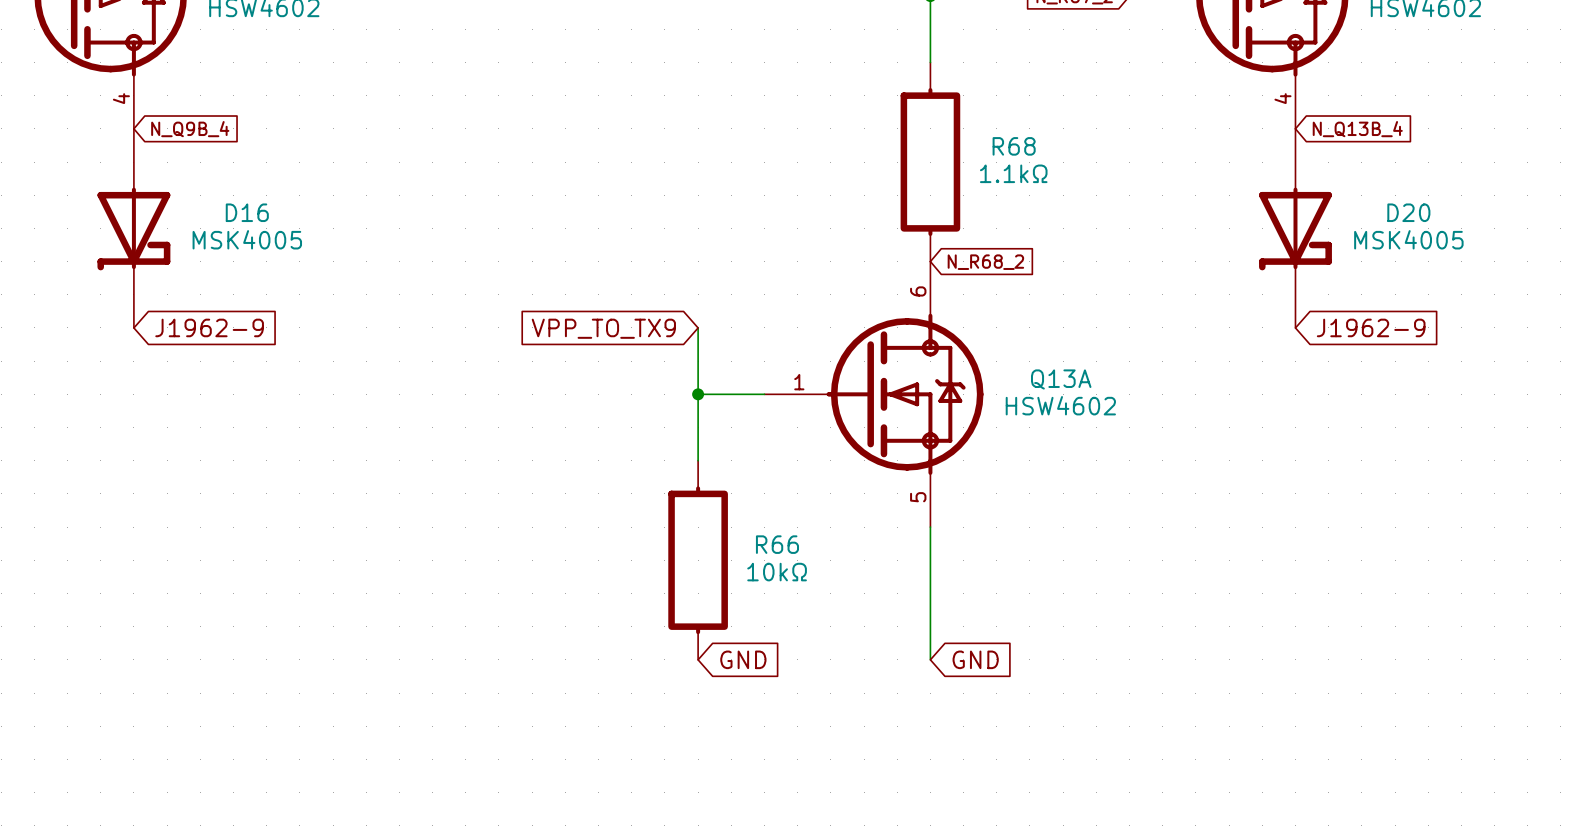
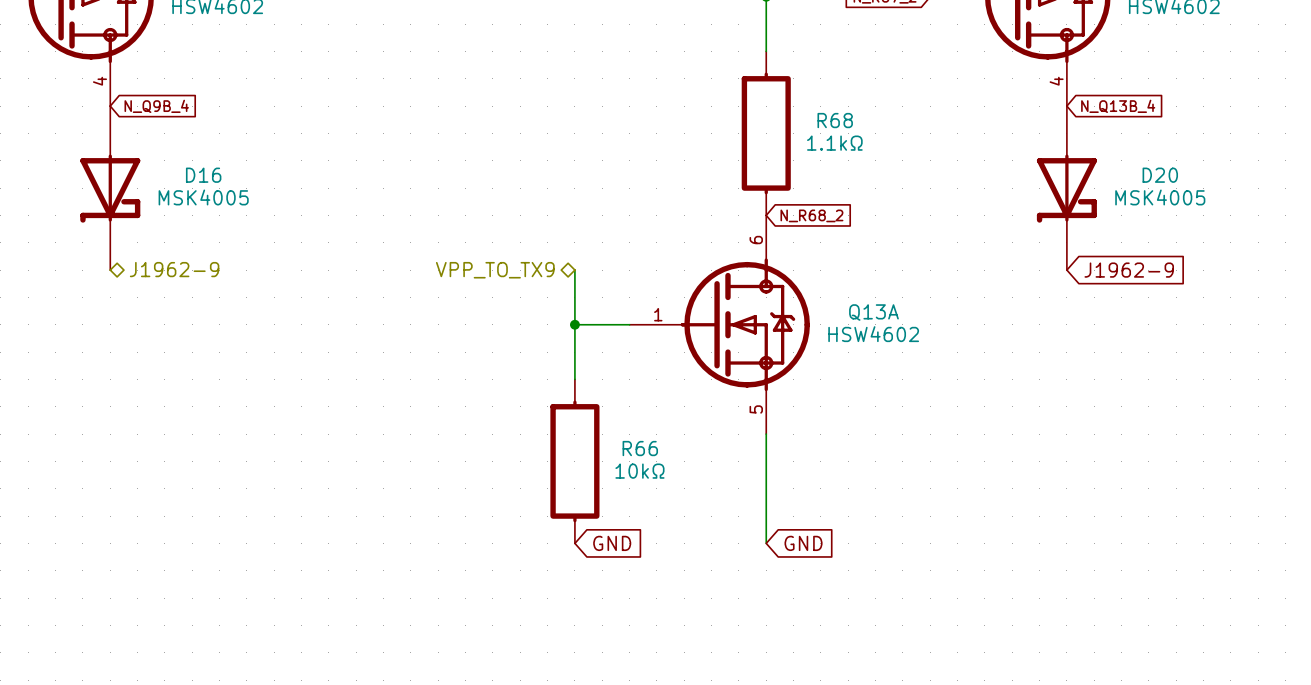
global label: J1962-9 (209, 327) -> none
hierarchical label: none -> J1962-9 (174, 269)
hierarchical label: none -> VPP_TO_TX9 (495, 270)
global label: VPP_TO_TX9 (603, 328) -> none

